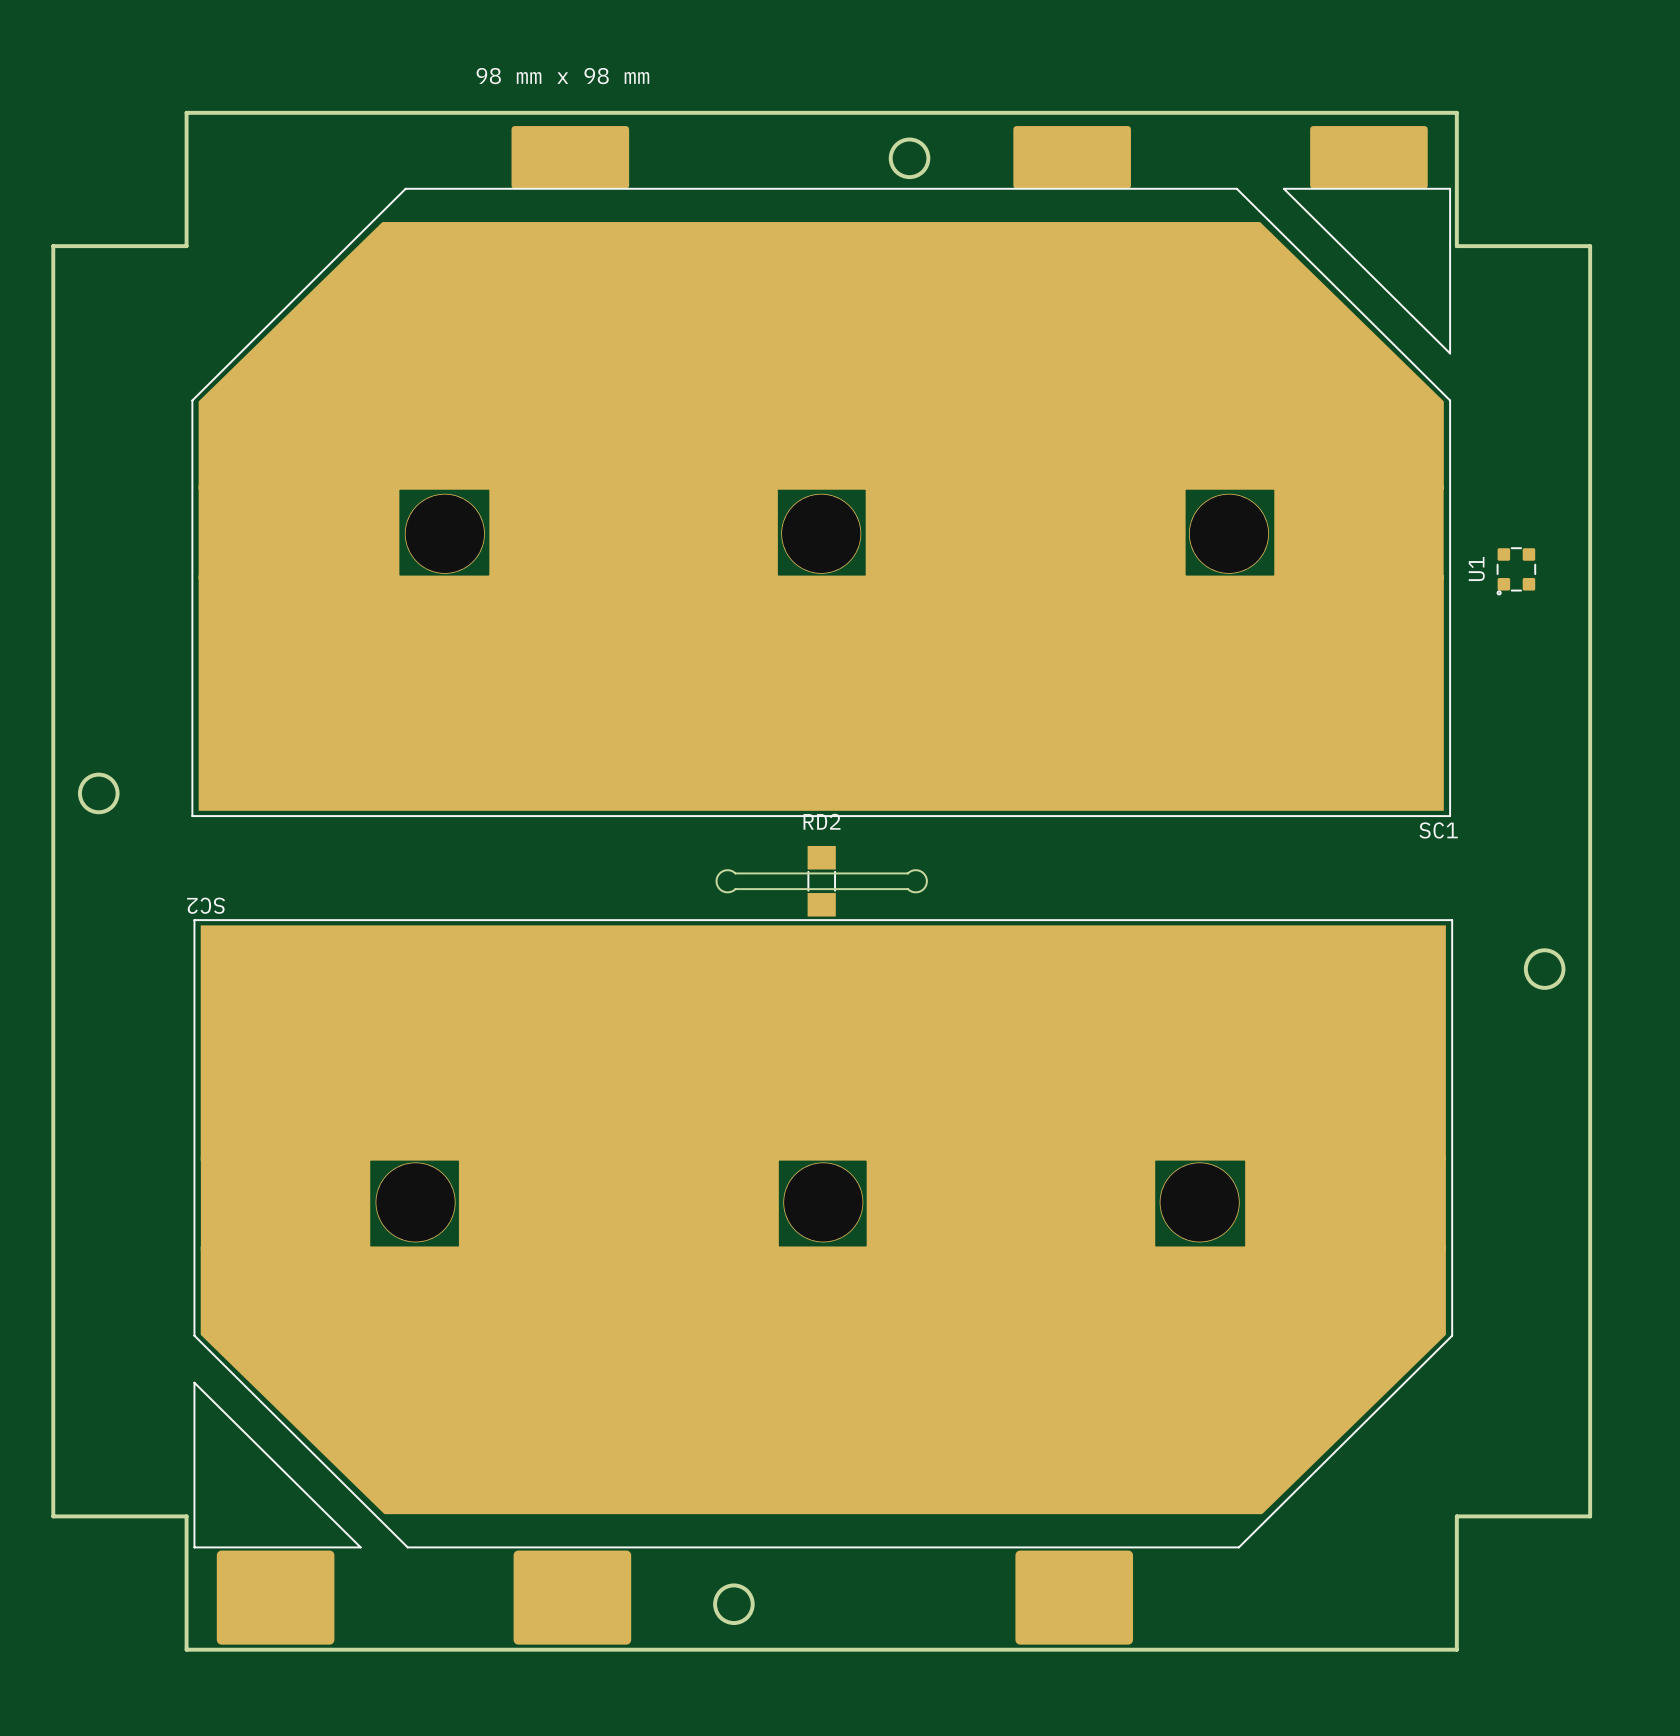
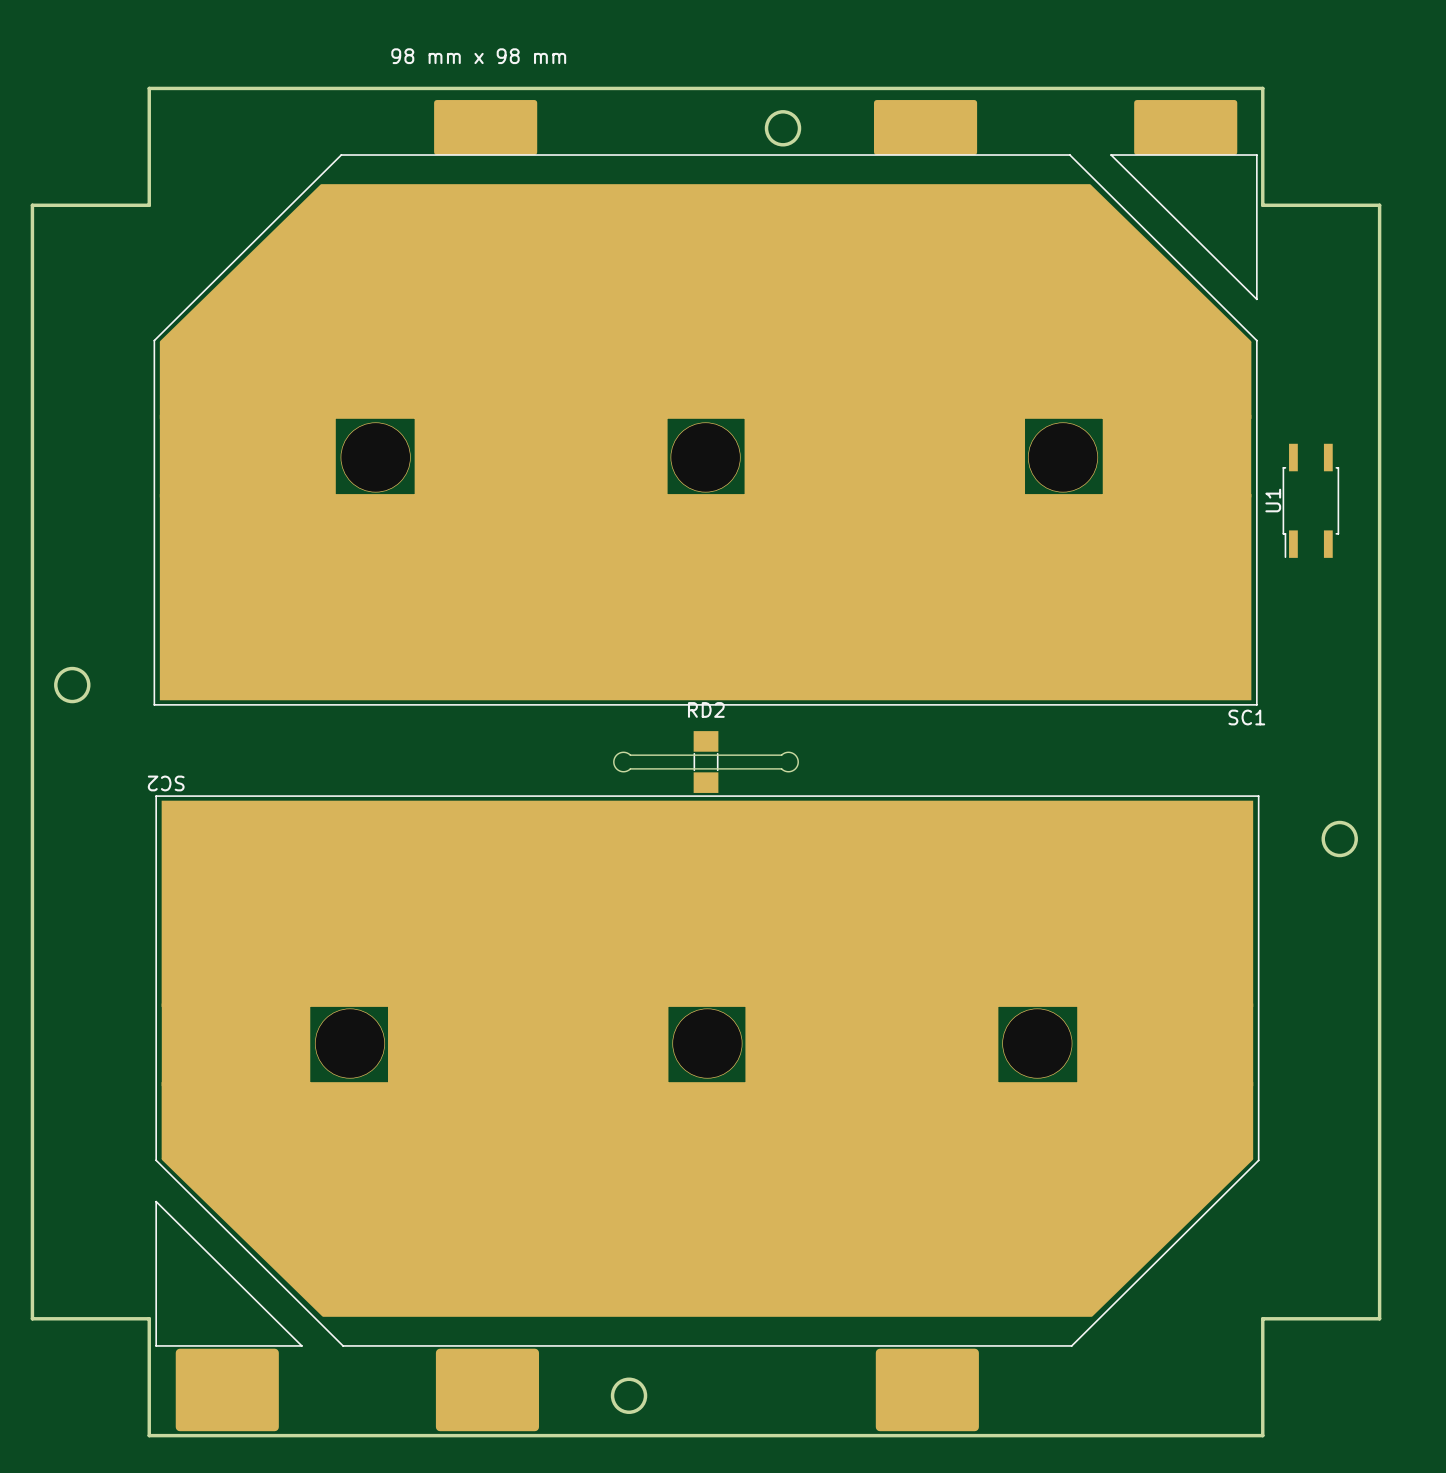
U1 footprint: [1496, 547, 1537, 596] -> [1282, 443, 1340, 559]

